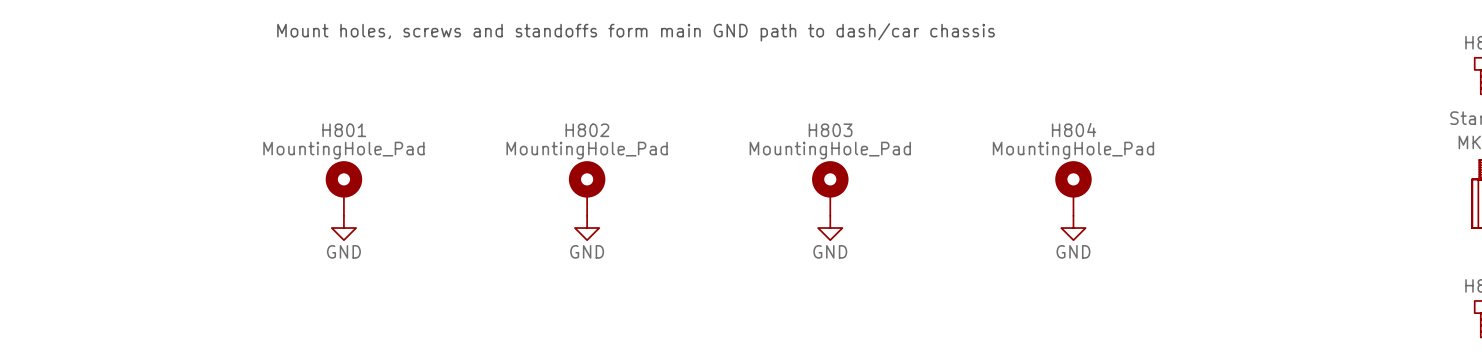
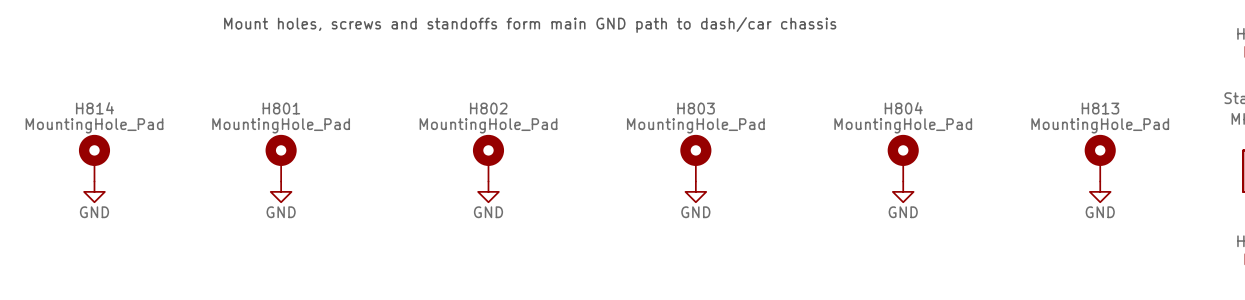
H814: none -> MountingHole_Pad (94, 158)
H813: none -> MountingHole_Pad (1100, 158)
power symbol: none -> GND (94, 191)
power symbol: none -> GND (1100, 191)

